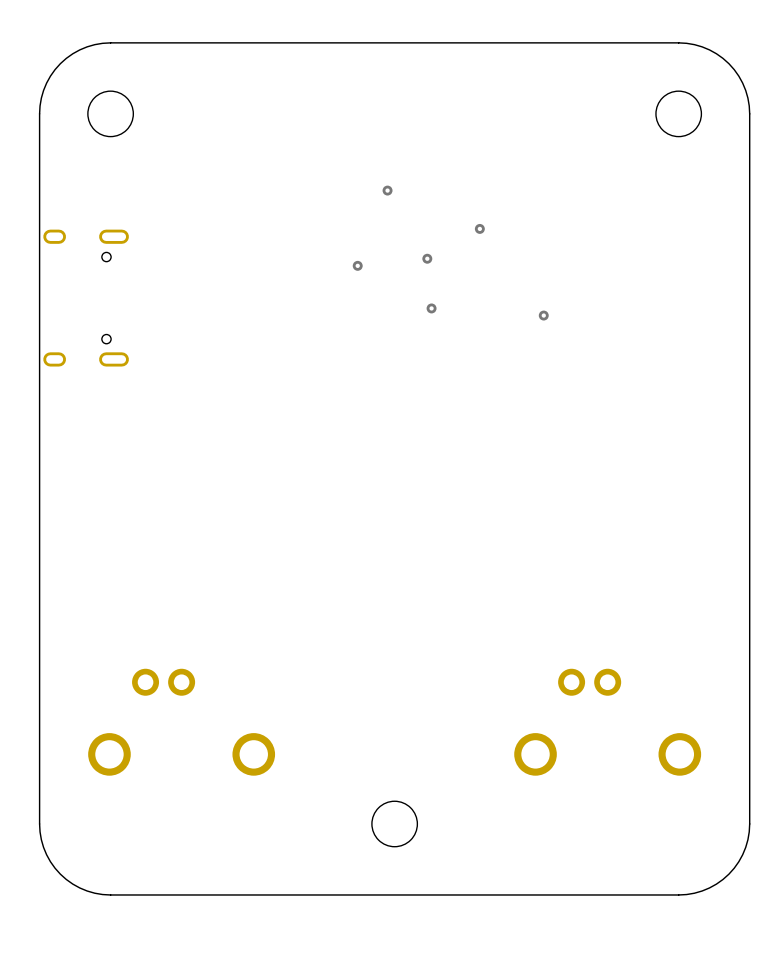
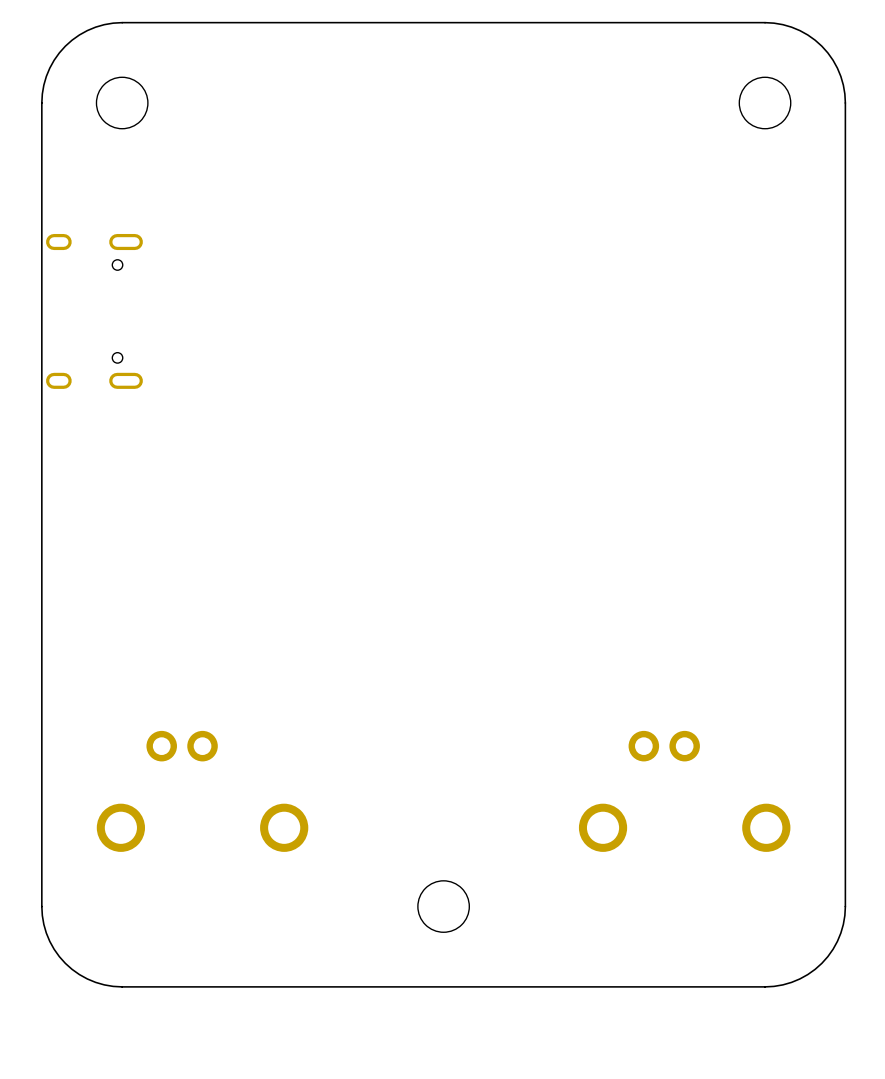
via: (387, 190) -> none
via: (479, 228) -> none
via: (427, 258) -> none
via: (357, 265) -> none
via: (431, 308) -> none
via: (543, 315) -> none

